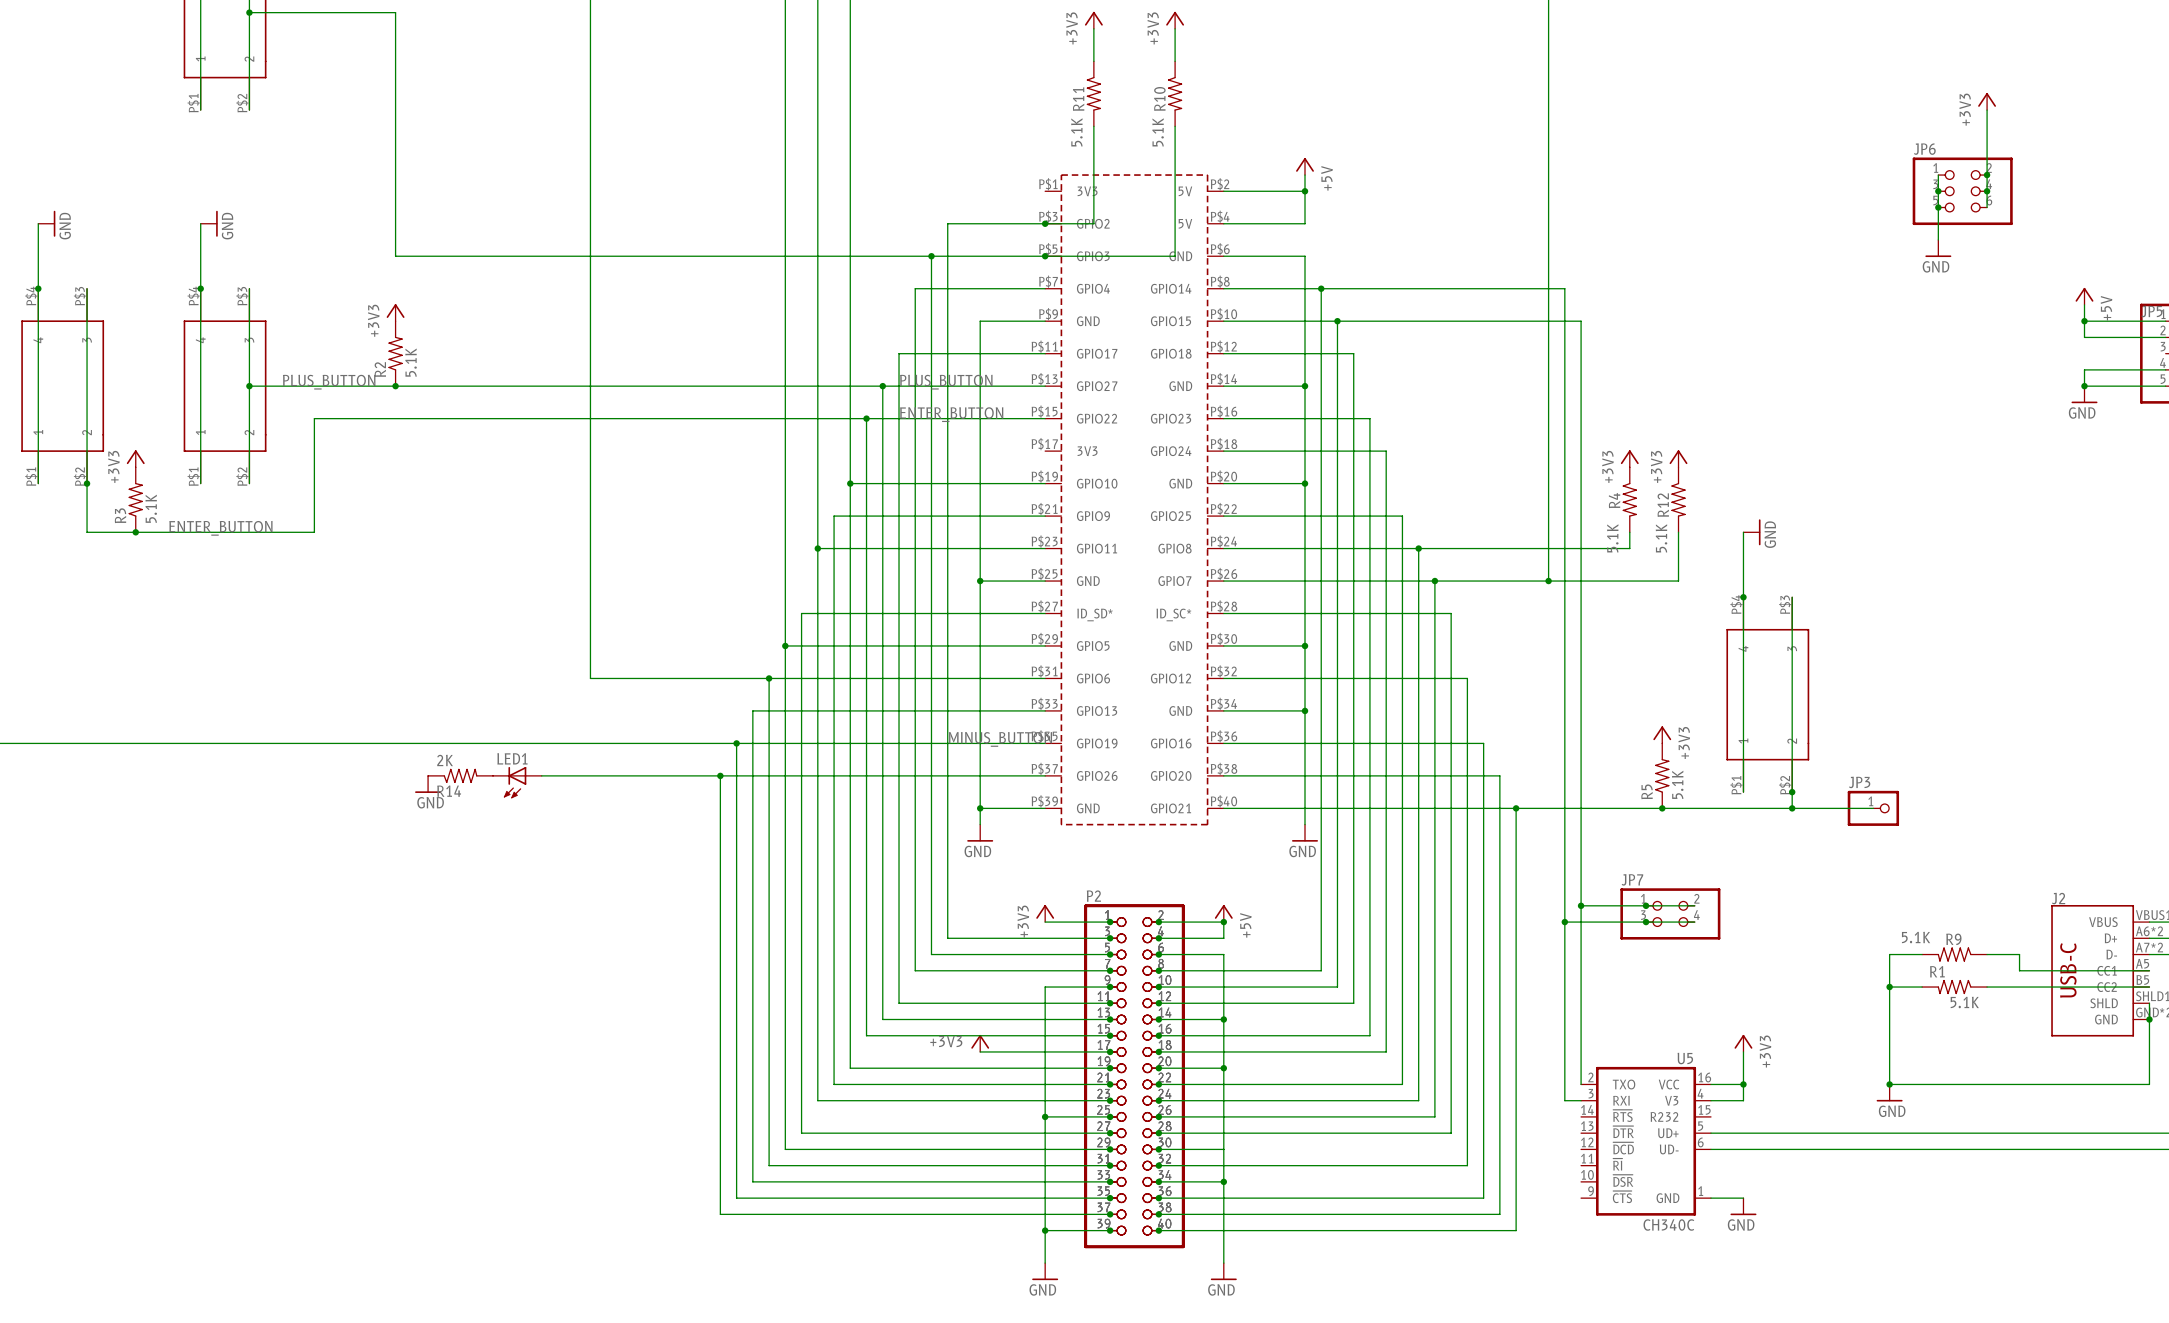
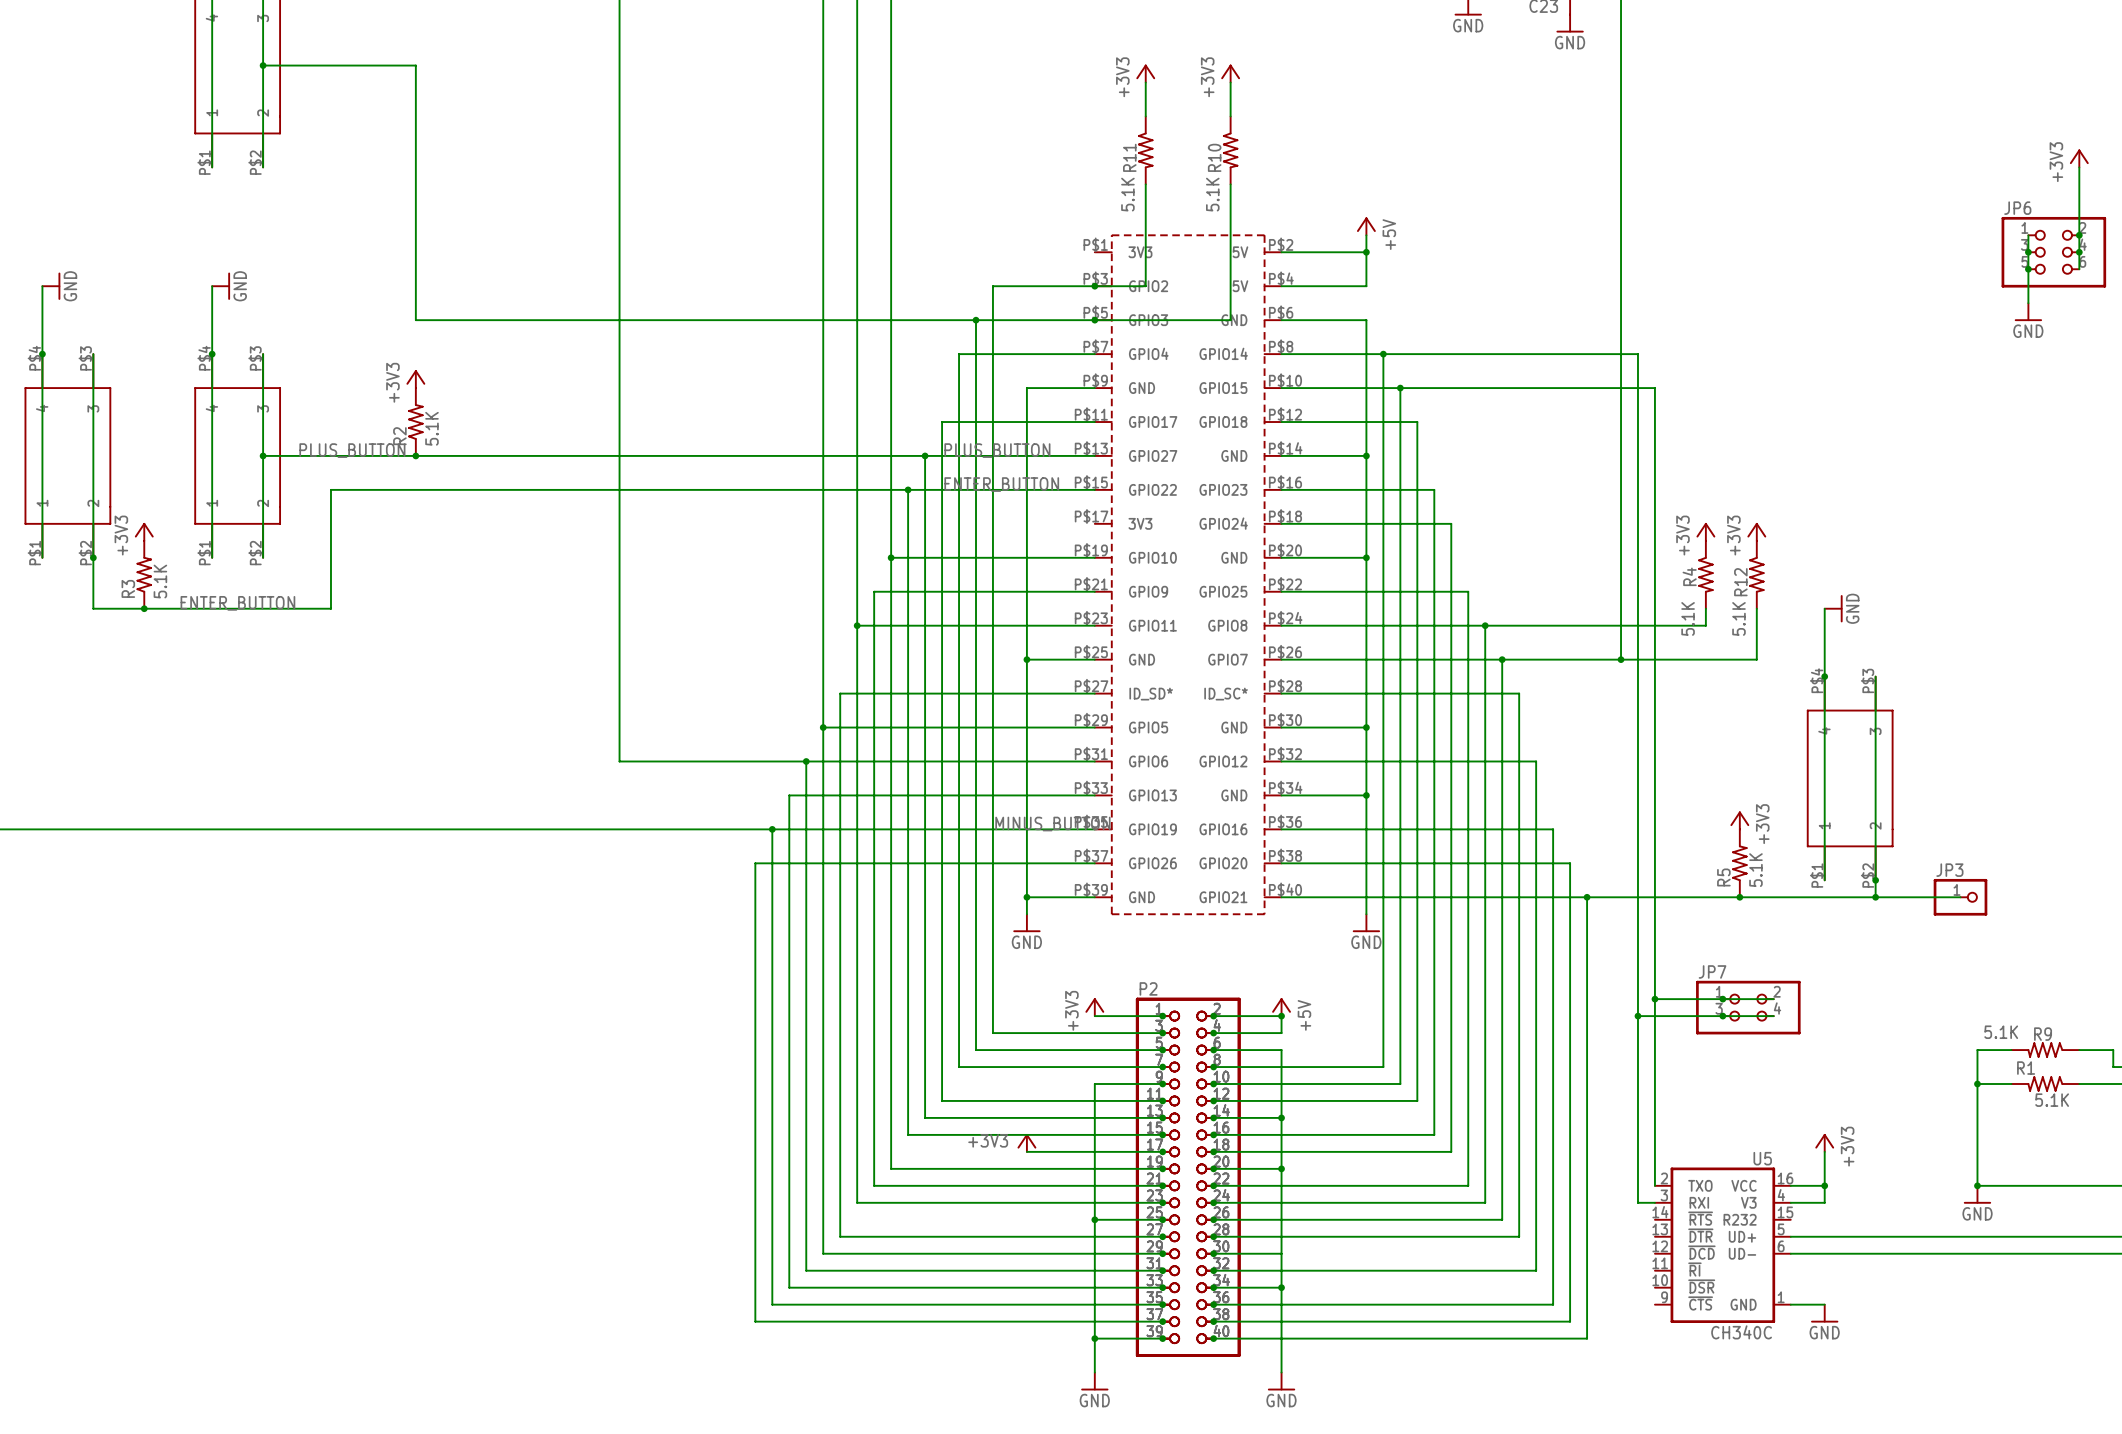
R14: 2K (460, 775) -> none
wire: (541, 775) (720, 775) -> none
junction: (720, 775) -> none
LED1: (517, 782) -> none
power symbol: GND (428, 784) -> none

